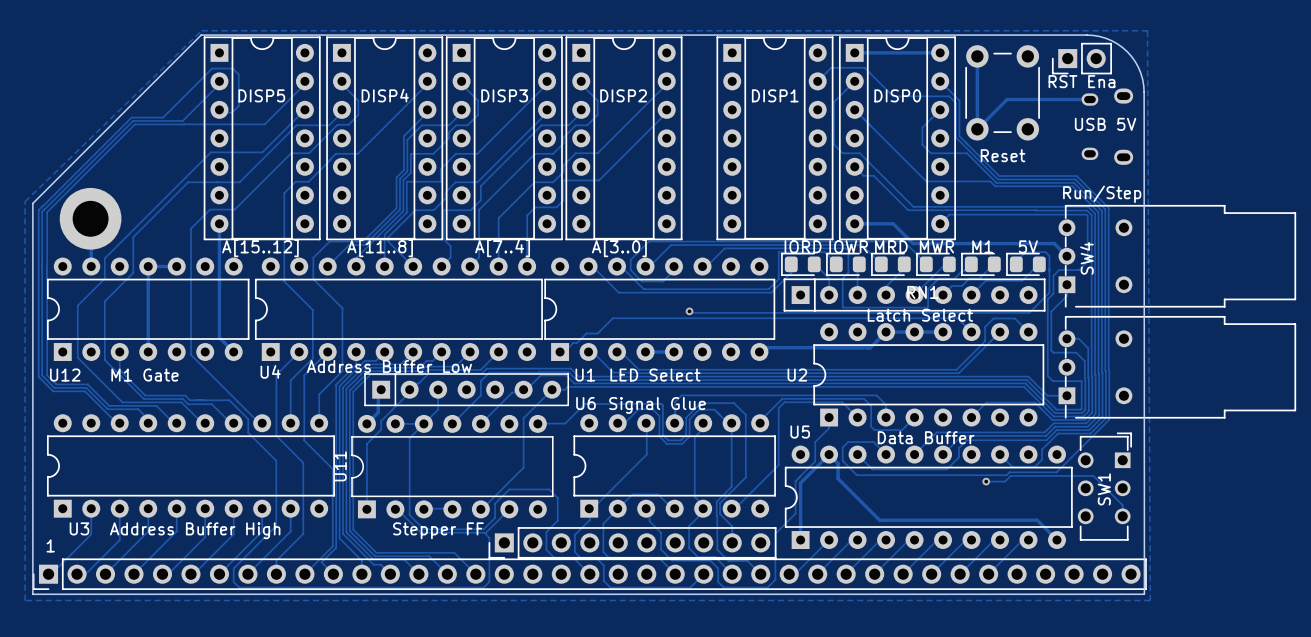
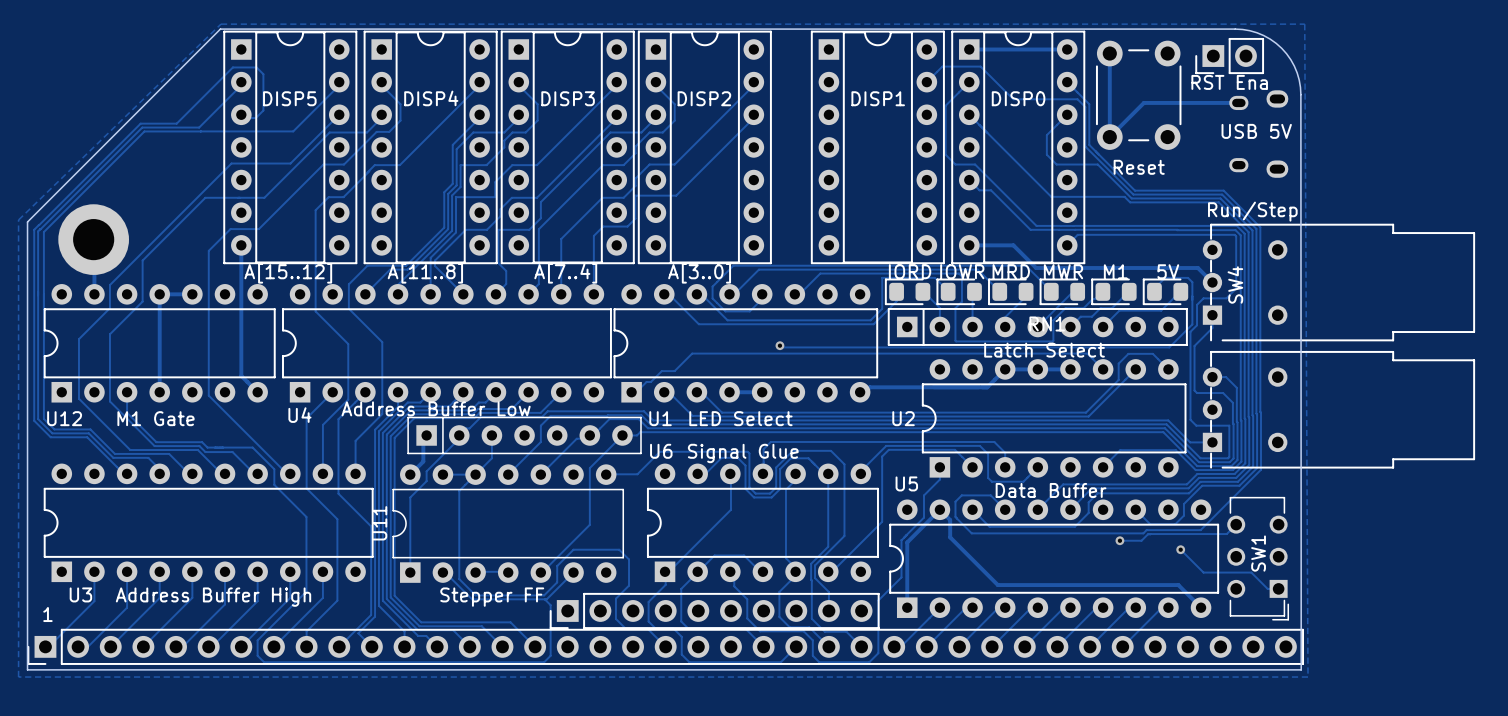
SW1 footprint: [1077, 432, 1132, 541] -> [1227, 496, 1290, 621]
track: (1012, 475) (1093, 475) (1122, 505) (1122, 516) -> (1150, 534) (1226, 534) (1236, 524)
track: none -> (1180, 549) (1203, 572) (1251, 572) (1267, 588) (1278, 588)
via: none -> (1180, 549)

